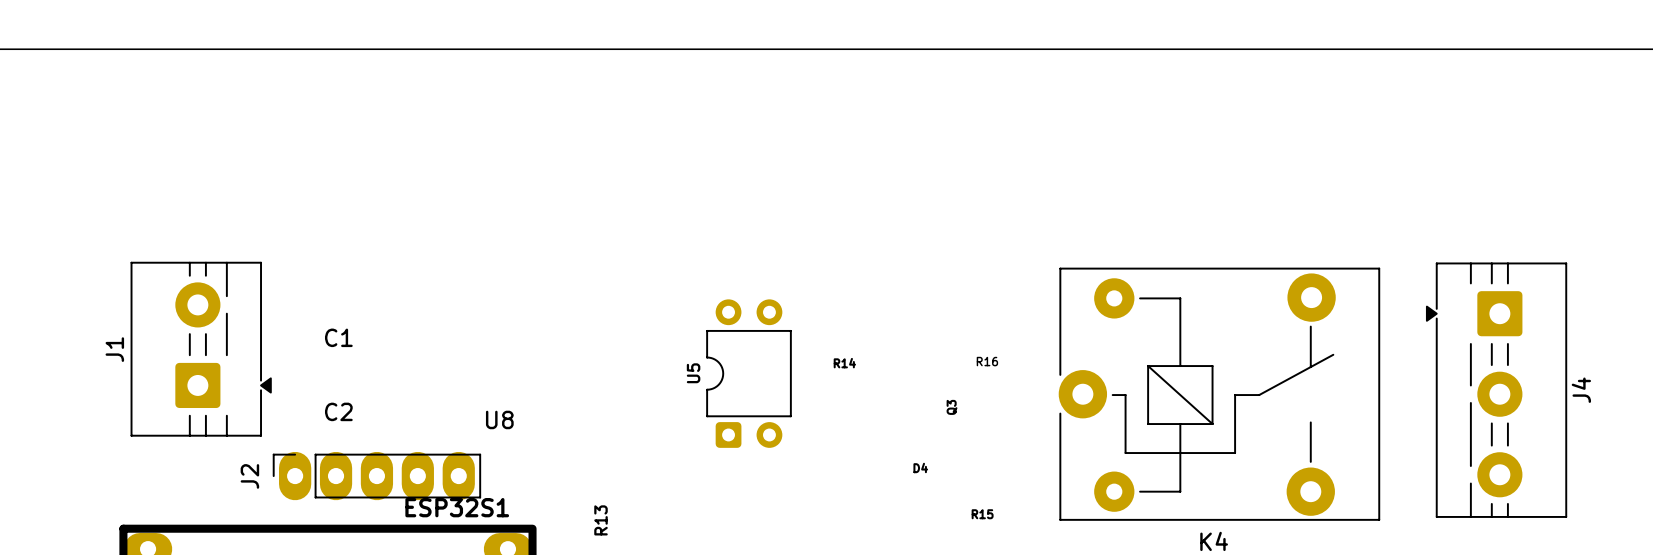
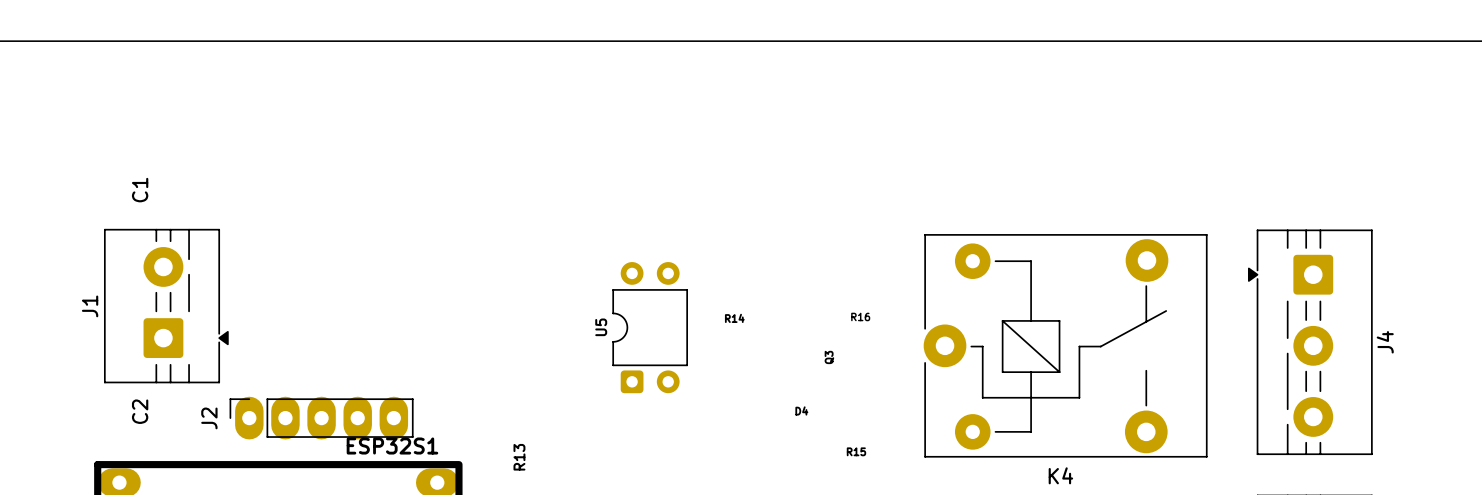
C1 position: (338, 337) -> (140, 190)
C1 name rotation: 0° (338, 337) -> 90° counterclockwise (140, 190)
C2 position: (338, 411) -> (140, 411)
C2 name rotation: 0° (338, 411) -> 90° counterclockwise (140, 411)
U8: (499, 419) -> none

